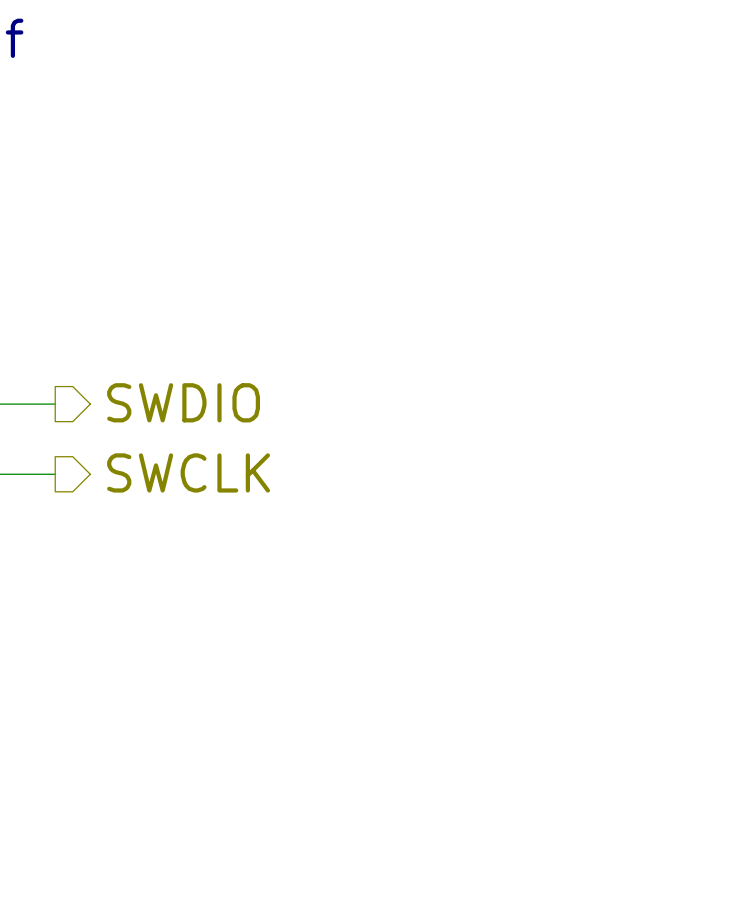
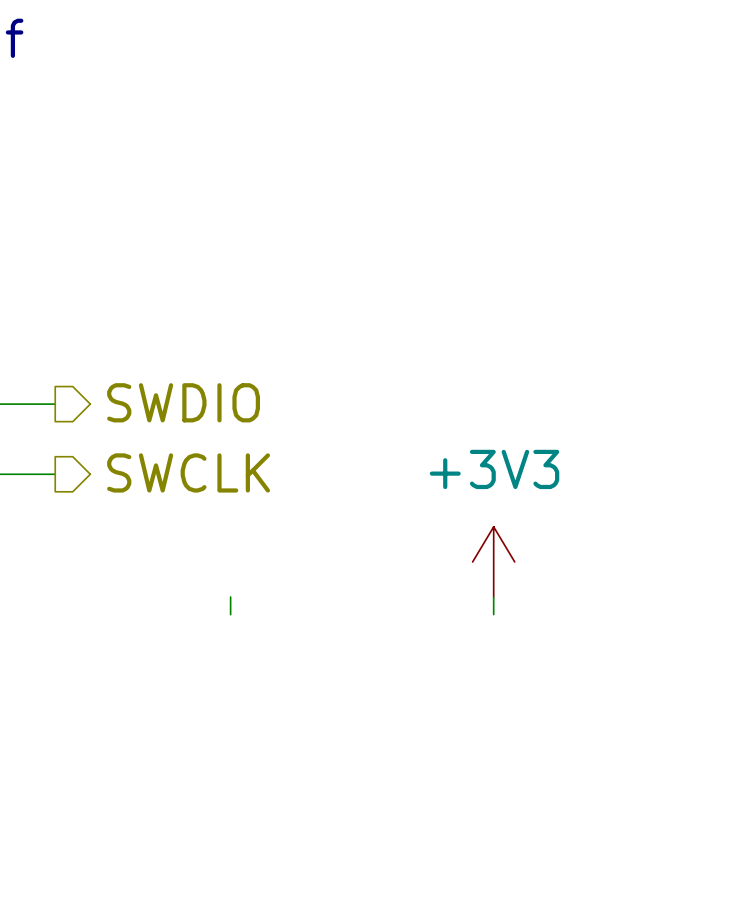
power symbol: none -> +3V3 (493, 561)
wire: none -> (230, 597) (230, 614)
wire: none -> (493, 597) (493, 614)

